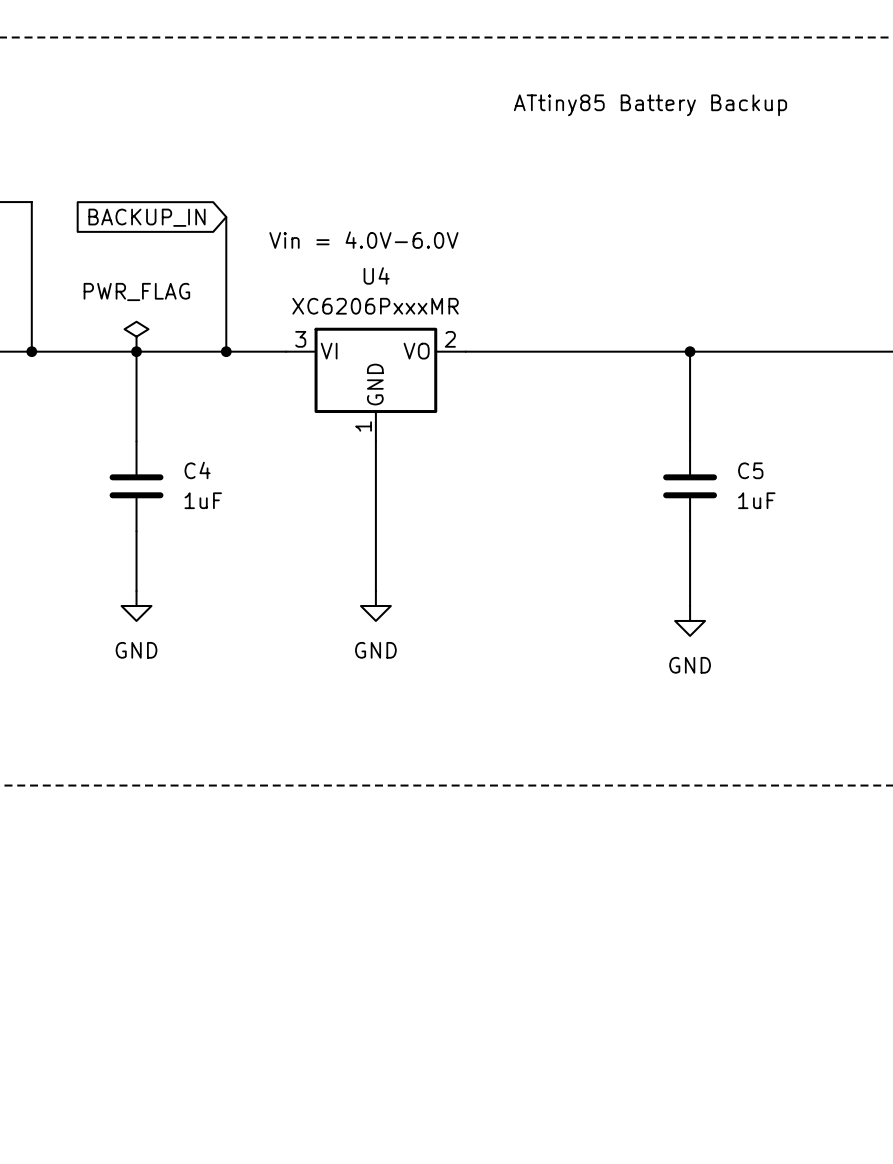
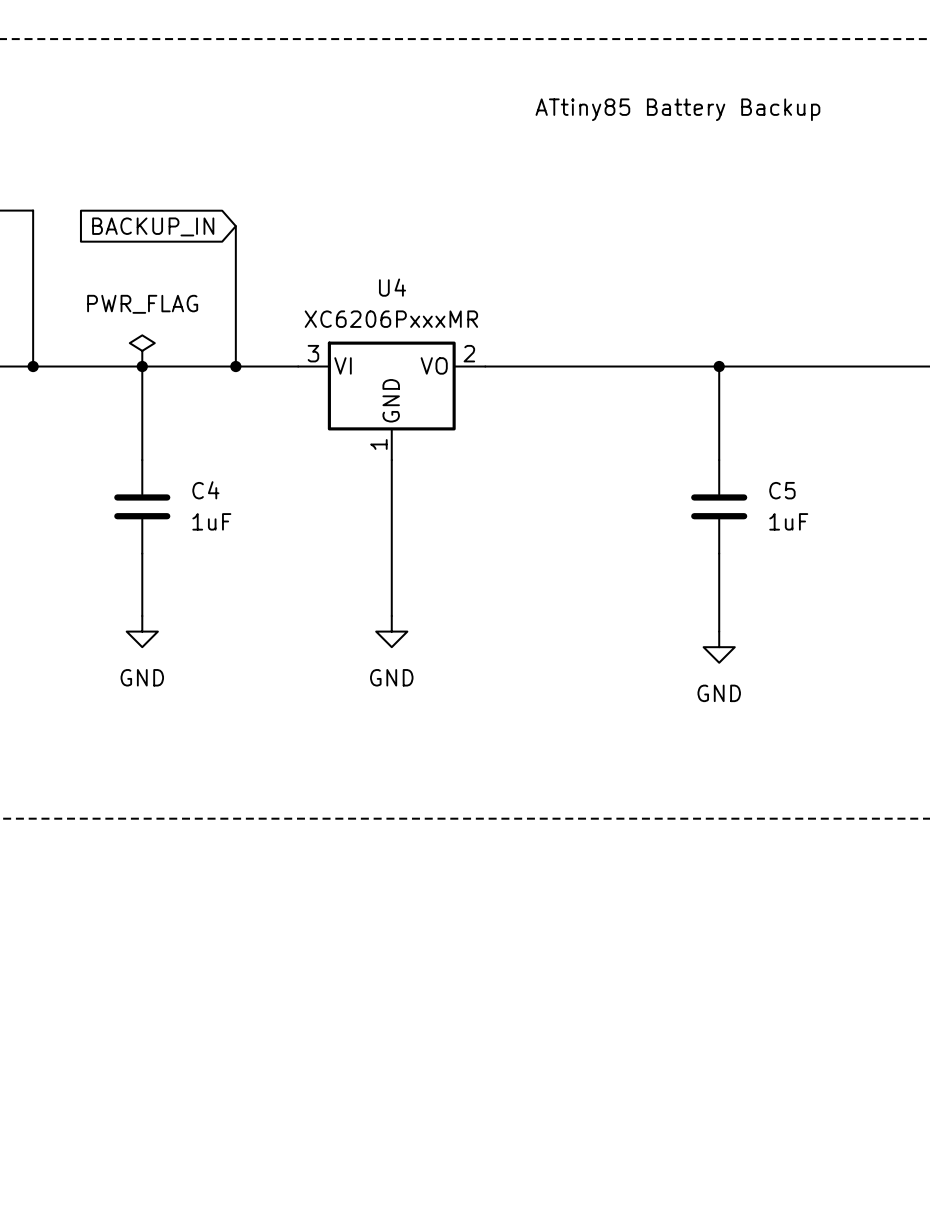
text: Vin = 4.0V-6.0V (363, 240) -> none

